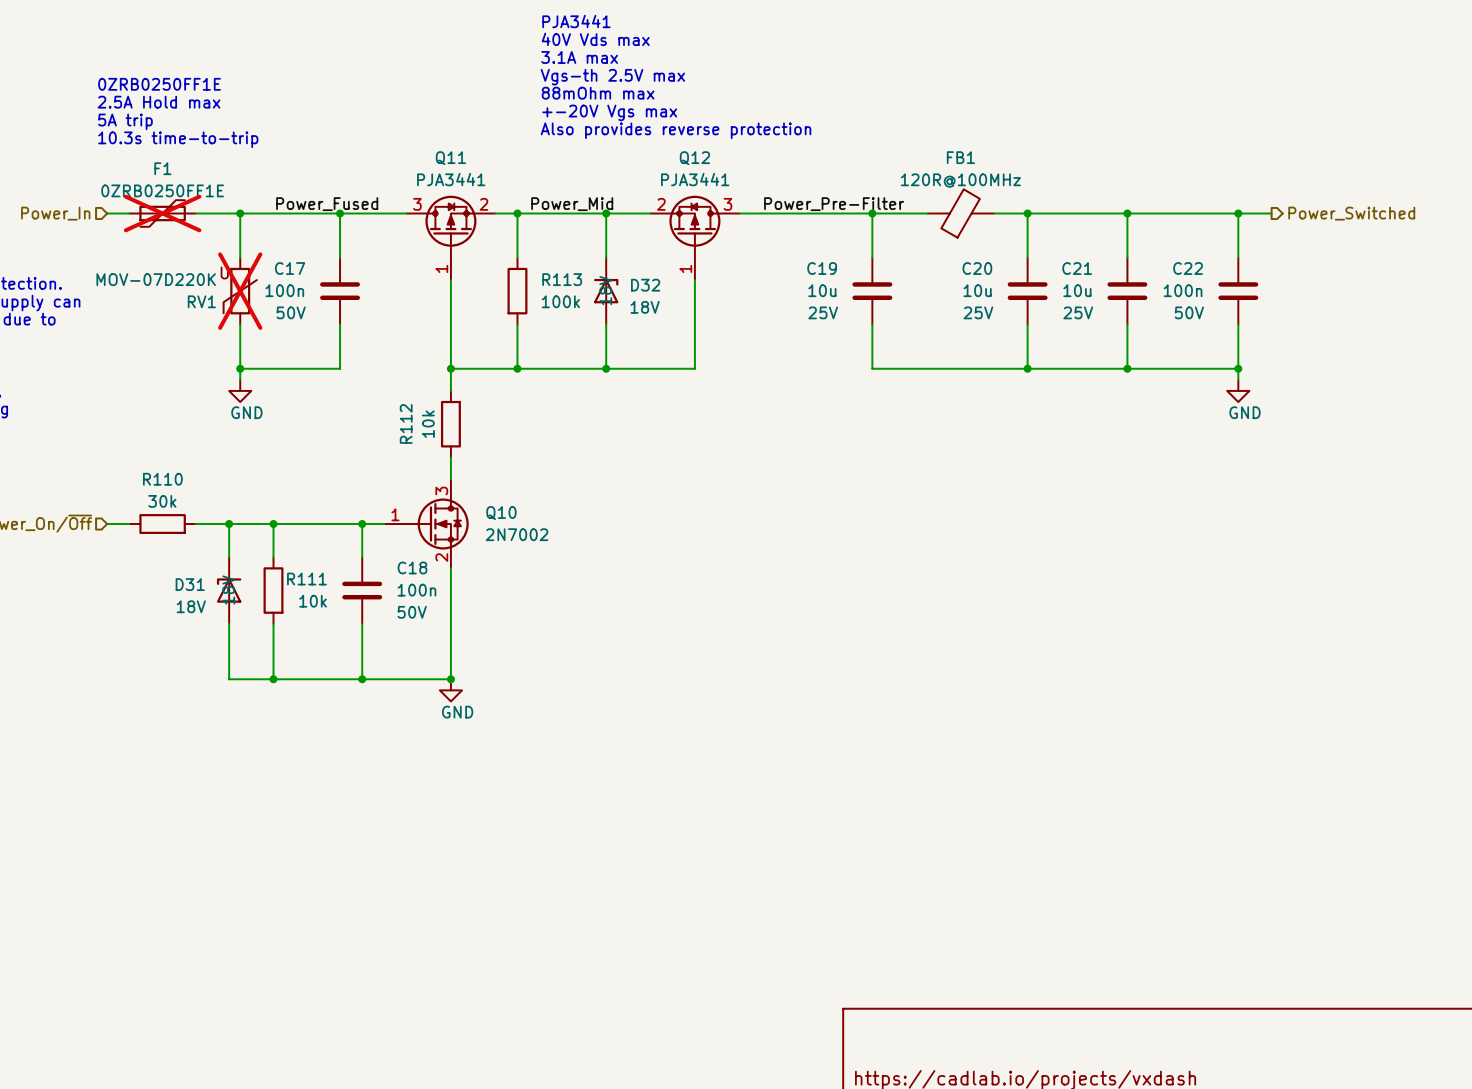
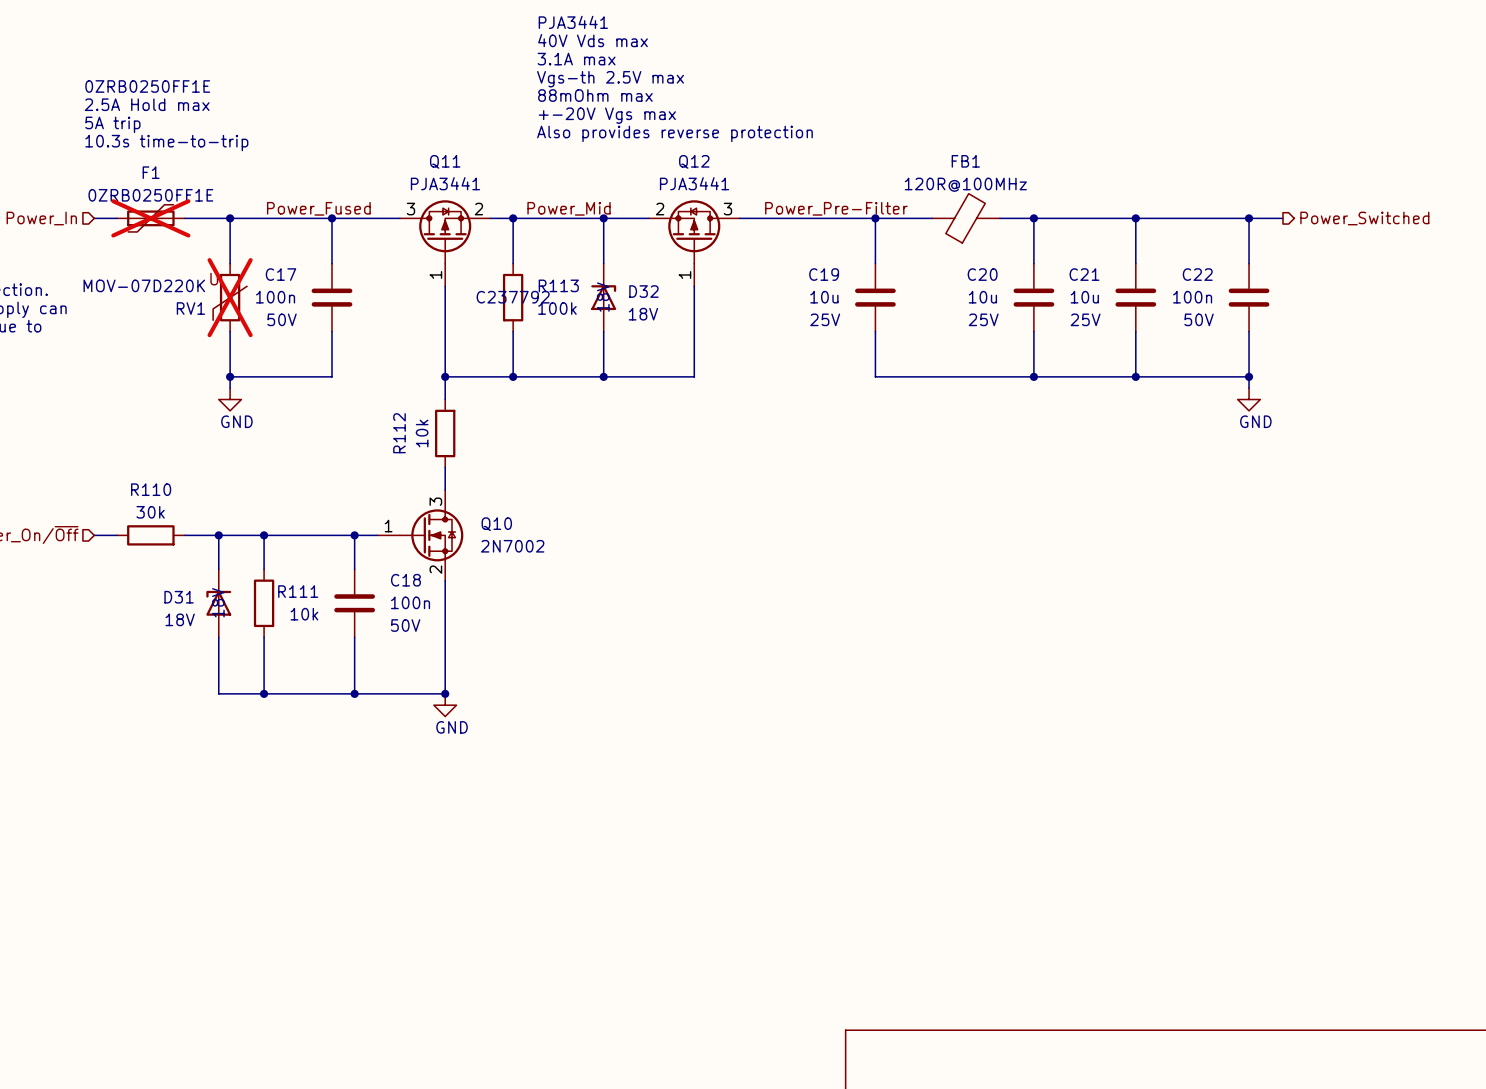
R113 text: none -> C237792 (513, 297)

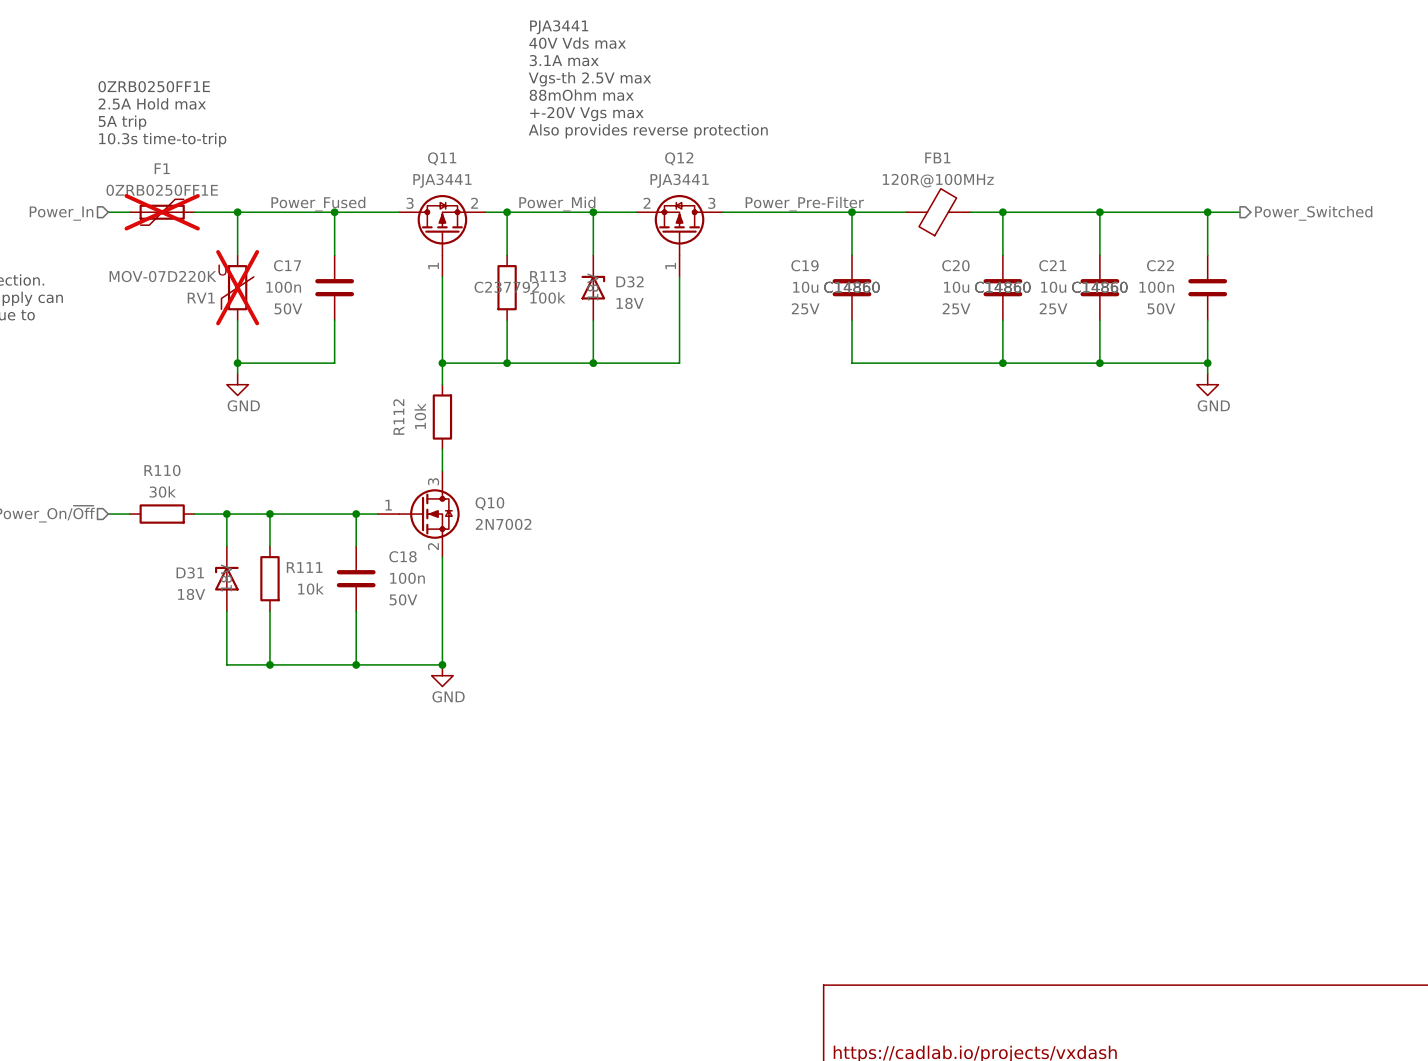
C19 text: none -> C14860 (851, 287)
C19 text: none -> C14860 (851, 287)
C20 text: none -> C14860 (1002, 287)
C20 text: none -> C14860 (1002, 287)
C21 text: none -> C14860 (1099, 287)
C21 text: none -> C14860 (1099, 287)

